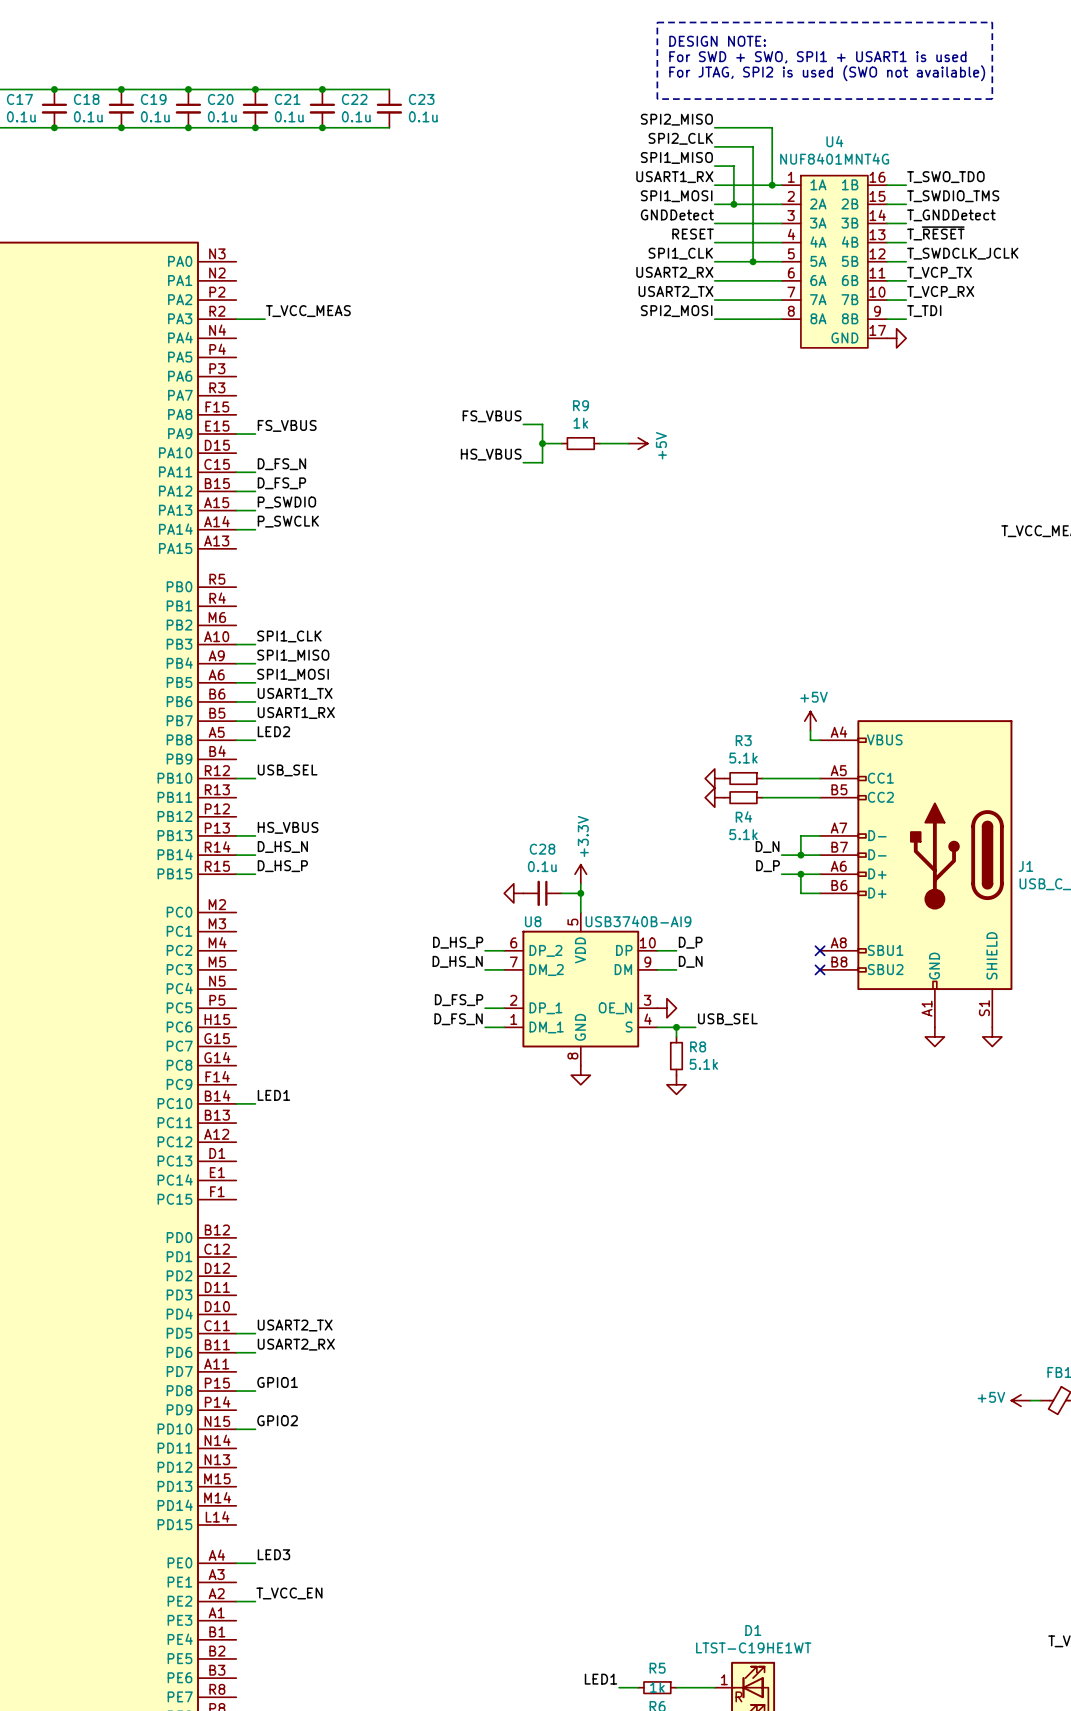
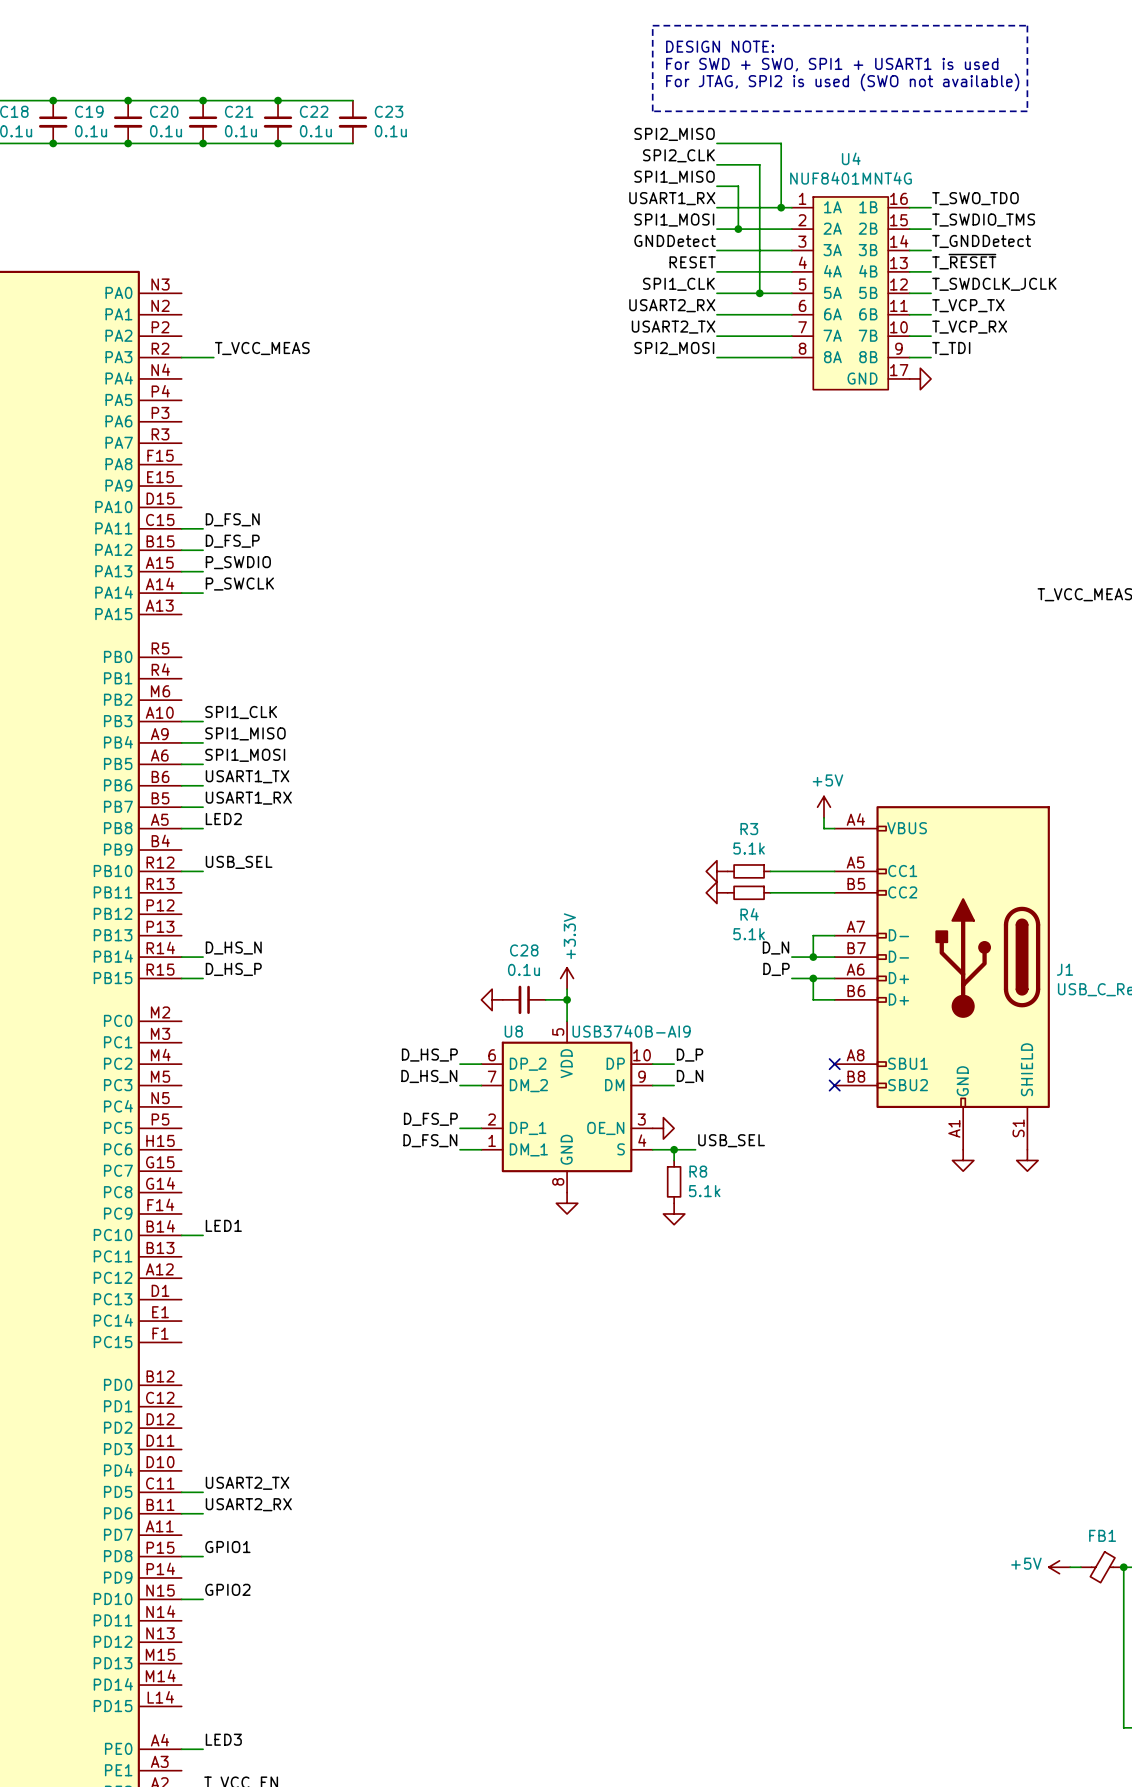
label: FS_VBUS (492, 416) -> none
wire: (523, 424) (542, 424) (542, 462) (523, 462) -> none
label: FS_VBUS (287, 425) -> none
wire: (236, 434) (255, 434) -> none
wire: (542, 443) (561, 443) -> none
junction: (542, 443) -> none
R9: 1k (580, 443) -> none
wire: (599, 443) (628, 443) -> none
power symbol: +5V (638, 443) -> none
label: HS_VBUS (491, 454) -> none
label: HS_VBUS (288, 827) -> none
wire: (236, 835) (255, 835) -> none

